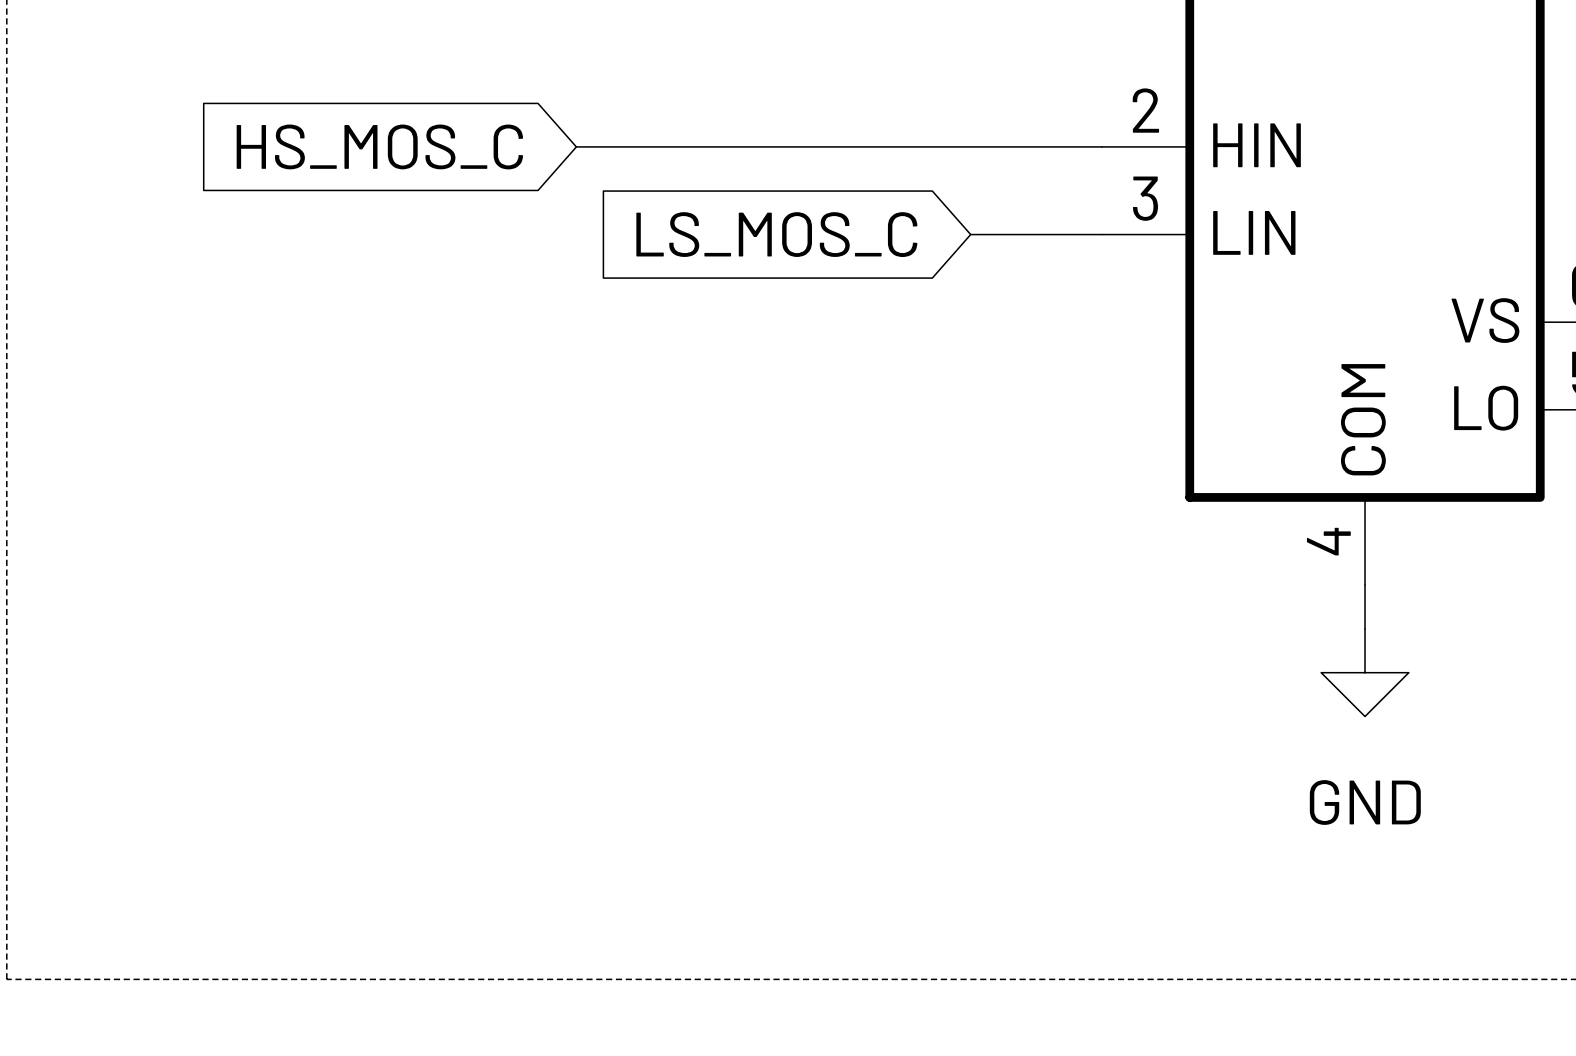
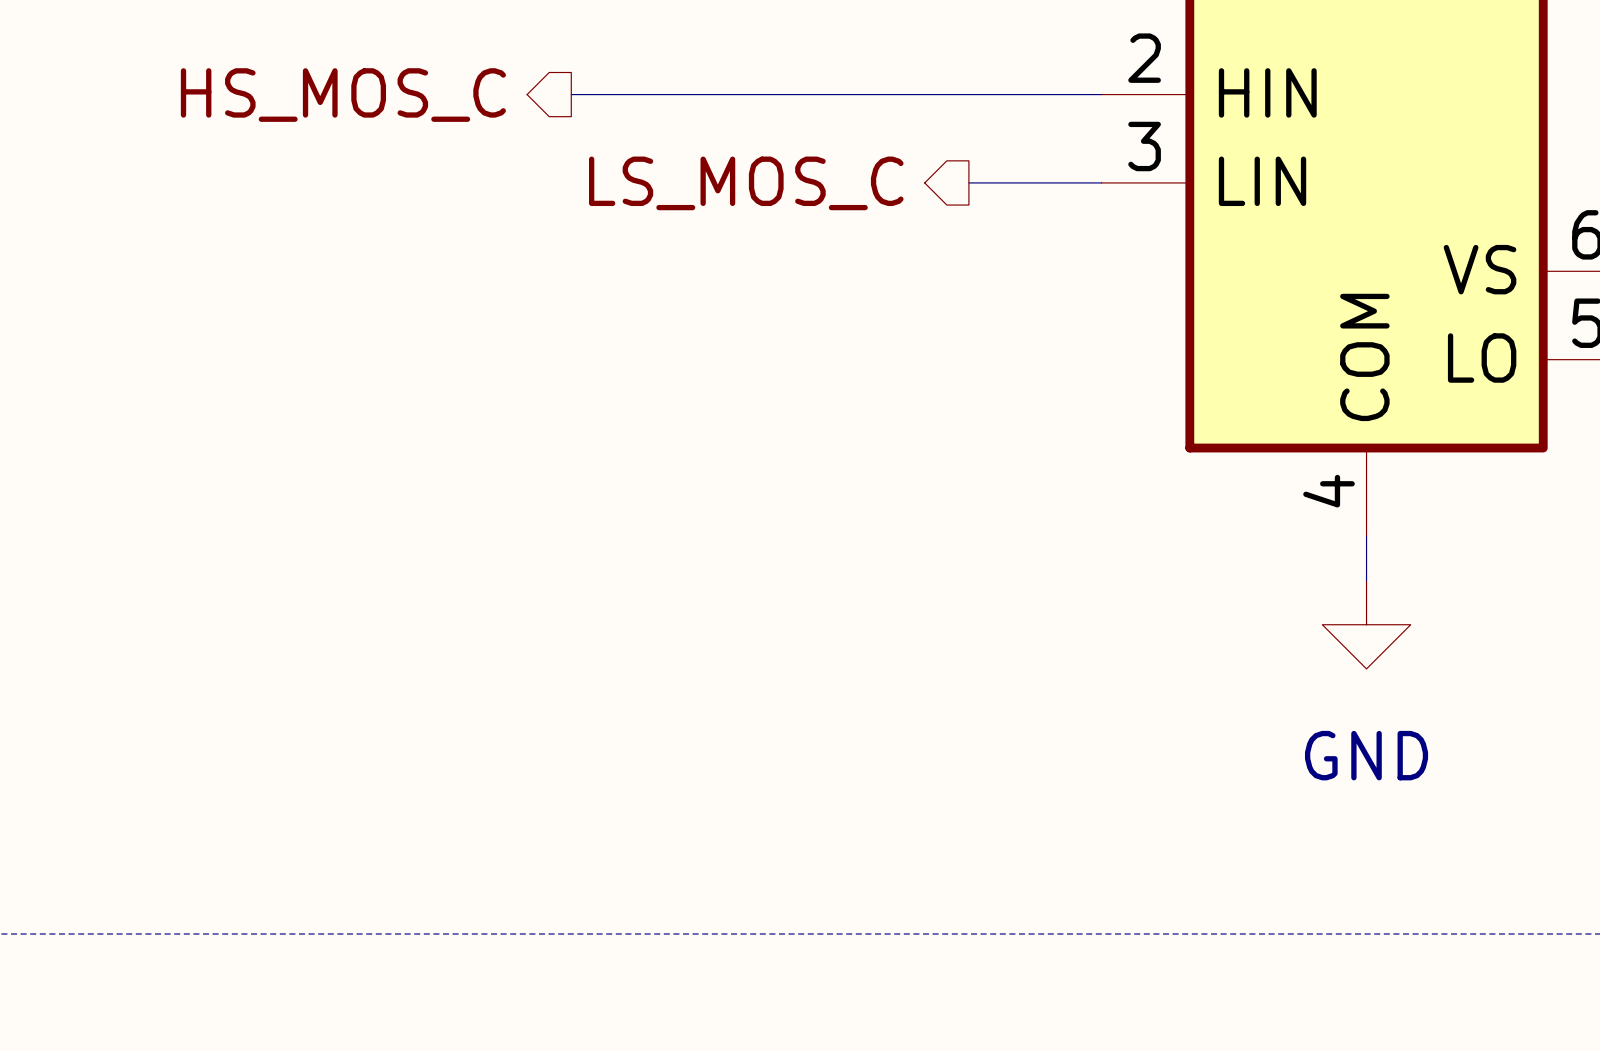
hierarchical label: none -> HS_MOS_C (343, 95)
global label: HS_MOS_C (379, 146) -> none
hierarchical label: none -> LS_MOS_C (746, 183)
global label: LS_MOS_C (776, 234) -> none

